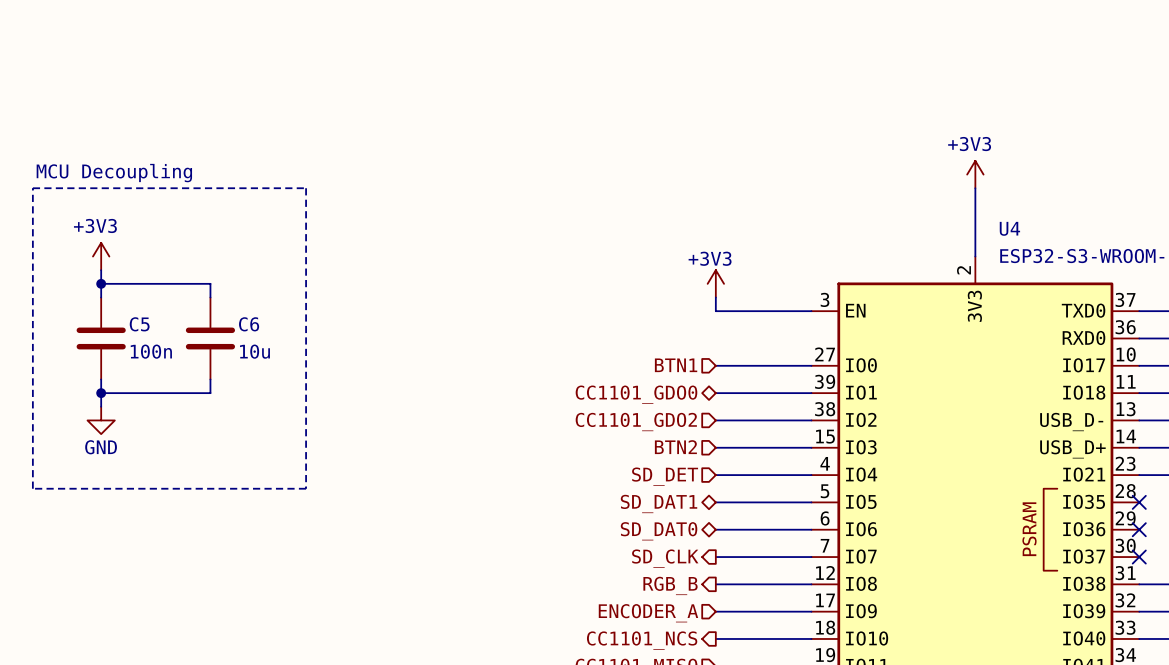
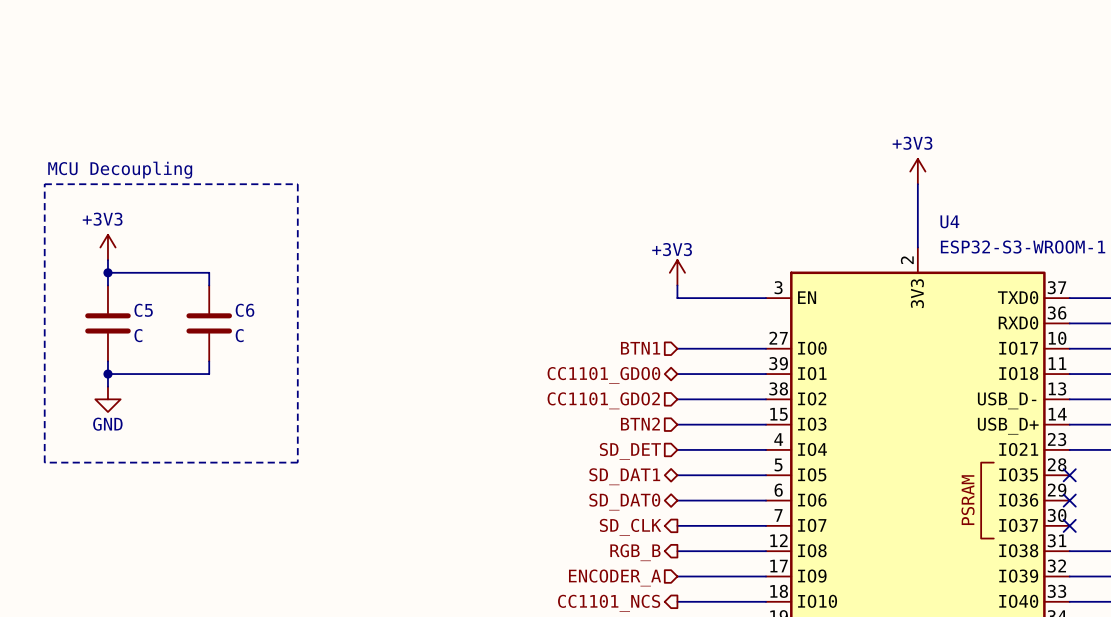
C5 value: 100n (151, 351) -> C (138, 335)
C6 value: 10u (254, 351) -> C (239, 335)

